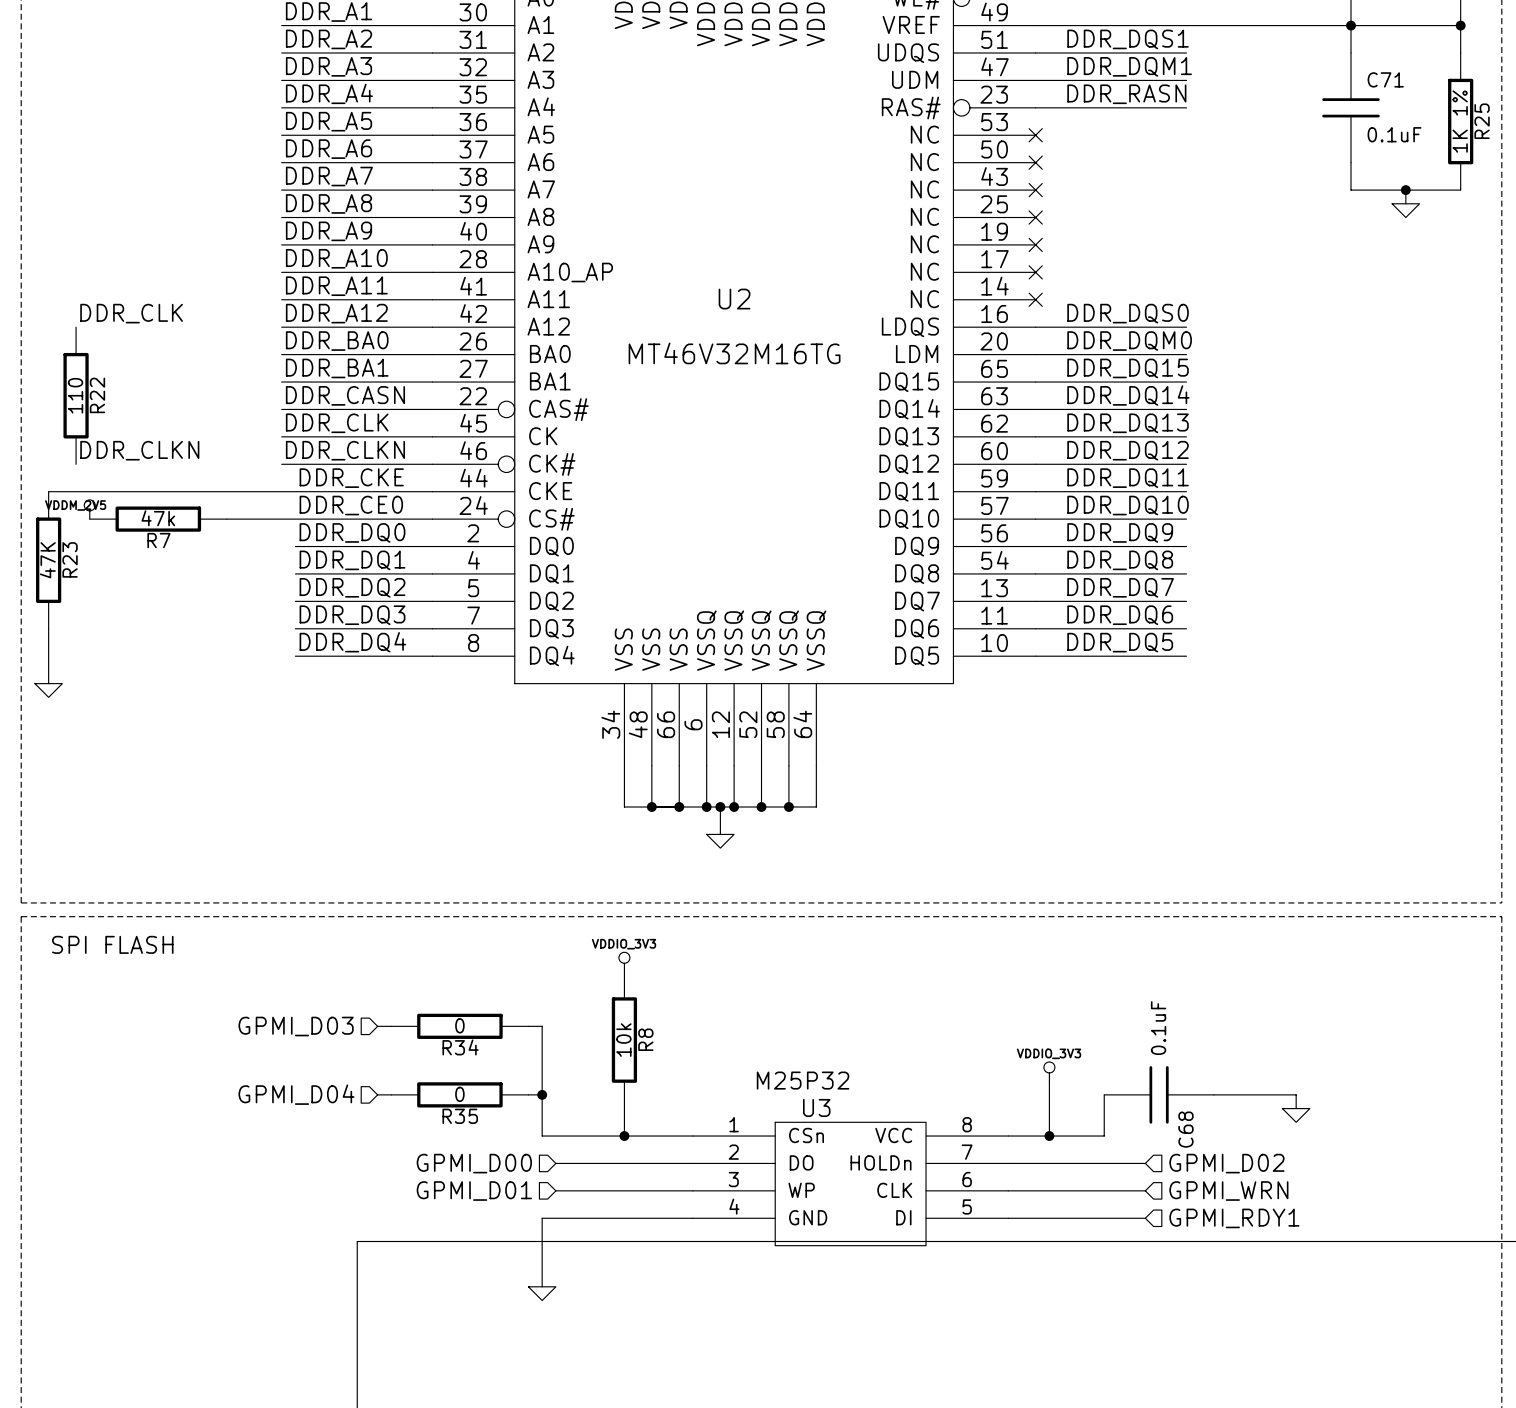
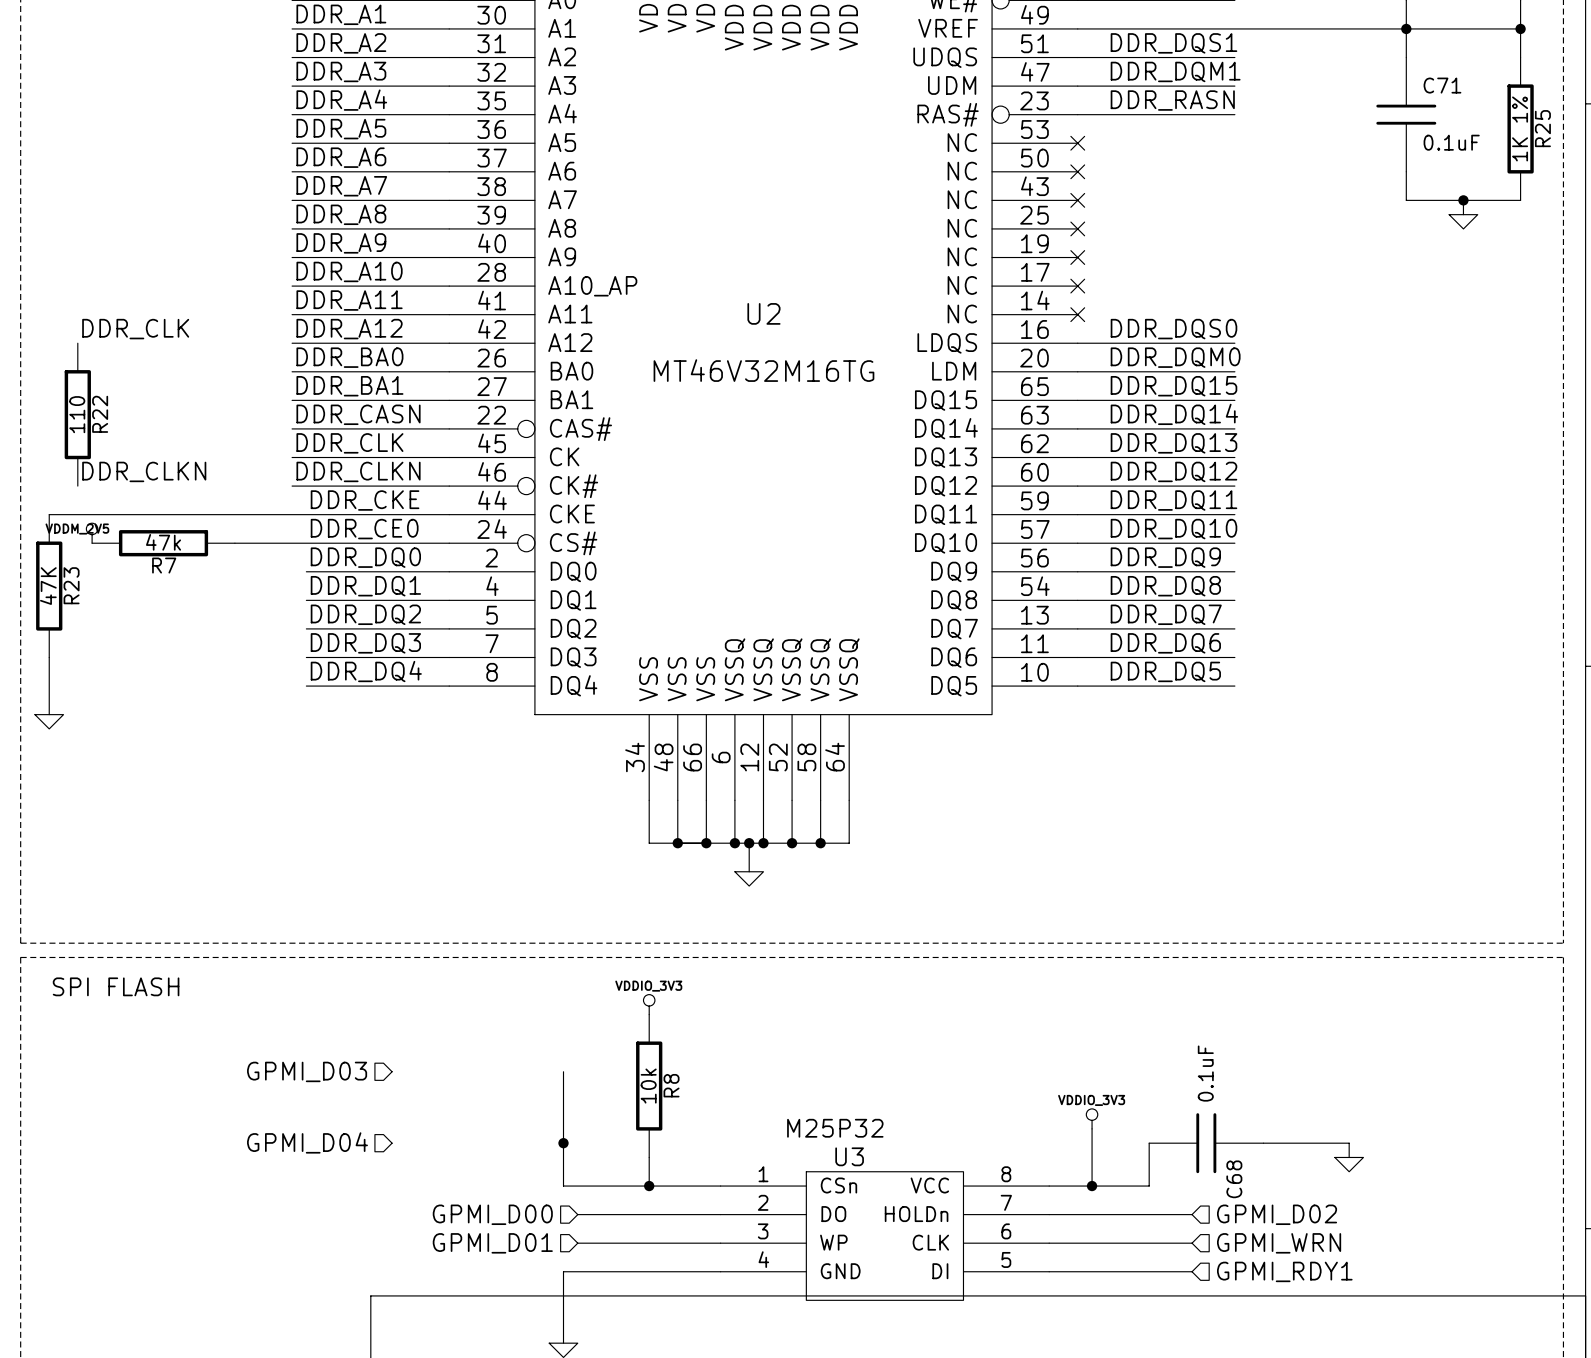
wire: (377, 1026) (391, 1026) -> none
R34: 0 (459, 1026) -> none
wire: (528, 1026) (542, 1026) -> none
wire: (377, 1094) (391, 1094) -> none
R35: 0 (459, 1094) -> none
wire: (528, 1094) (542, 1094) -> none

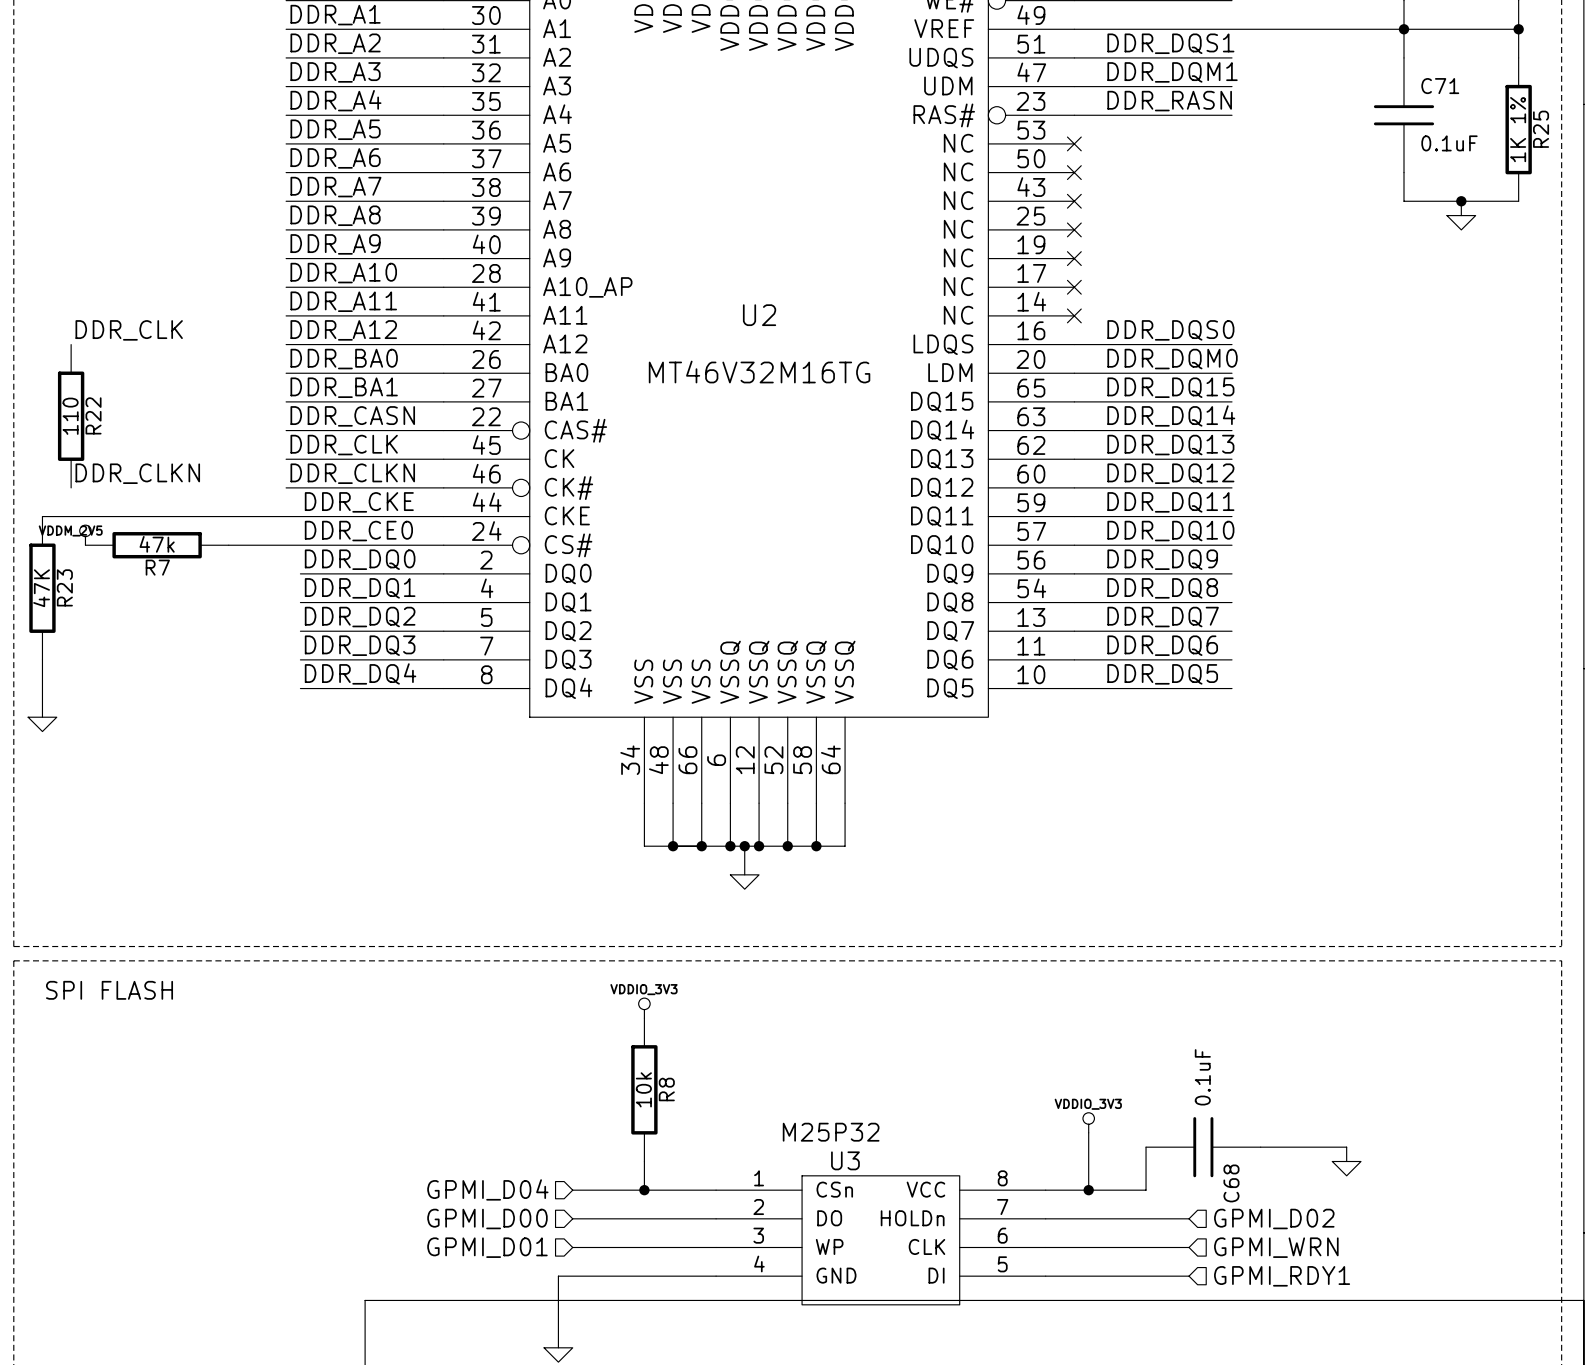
hierarchical label: GPMI_D03 (307, 1071) -> none
wire: (563, 1071) (563, 1186) (577, 1186) -> none
hierarchical label position: GPMI_D04 (307, 1142) -> GPMI_D04 (487, 1189)
junction: (563, 1143) -> none

